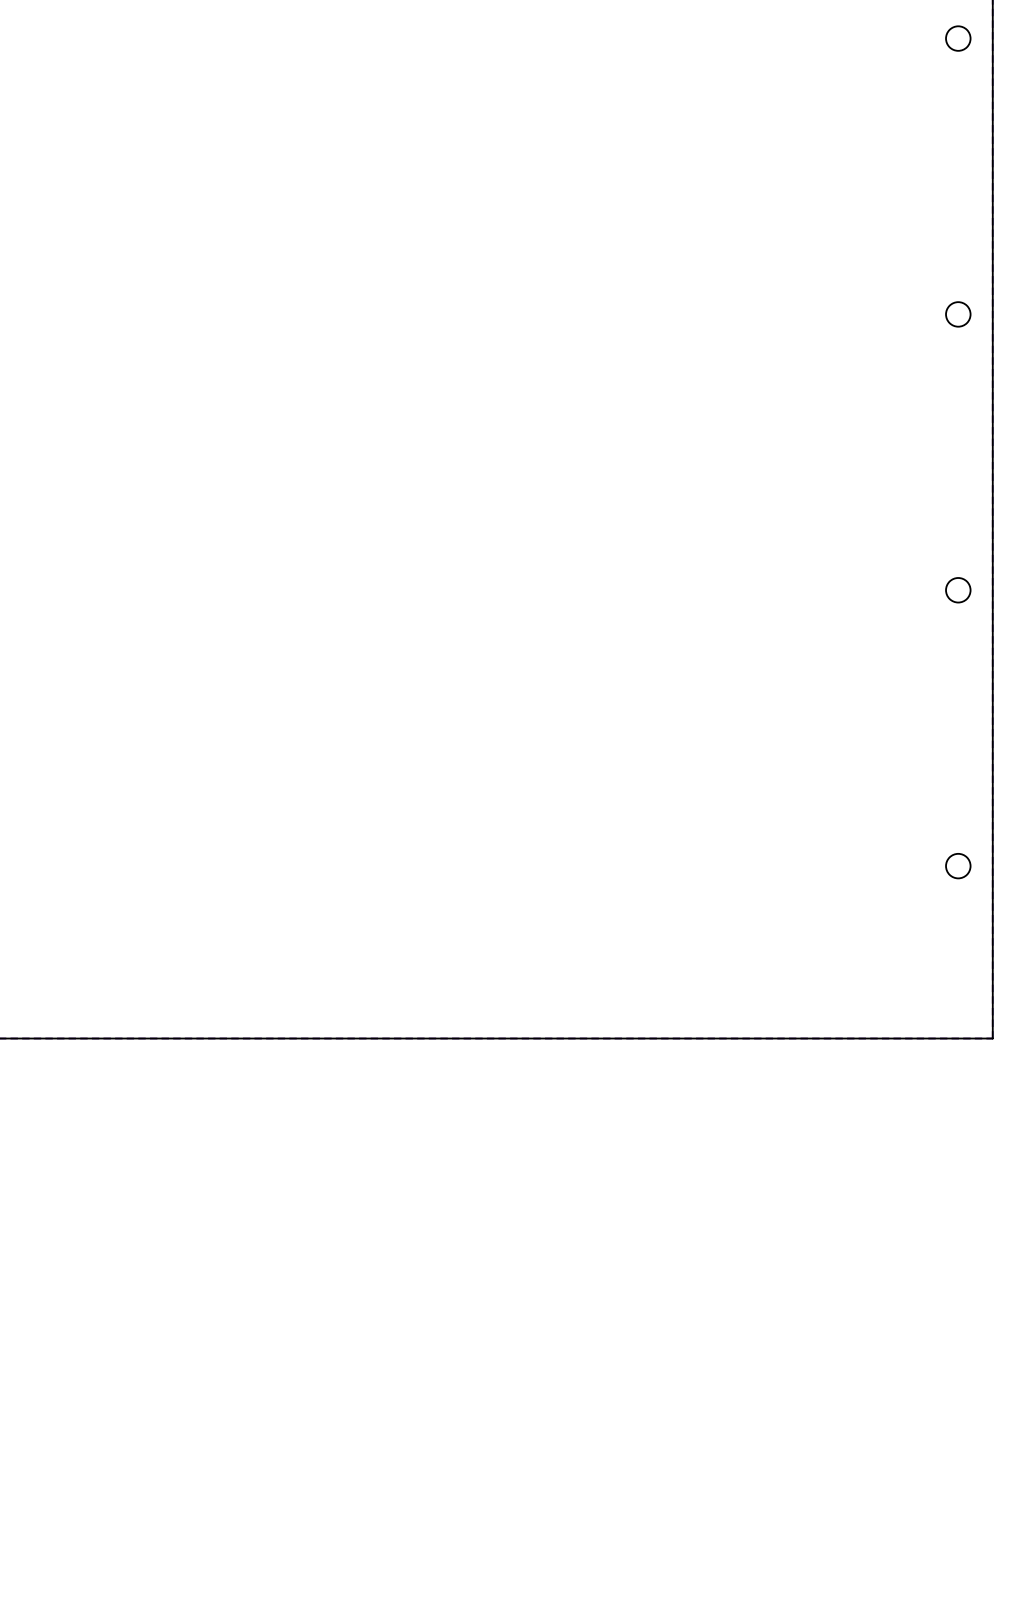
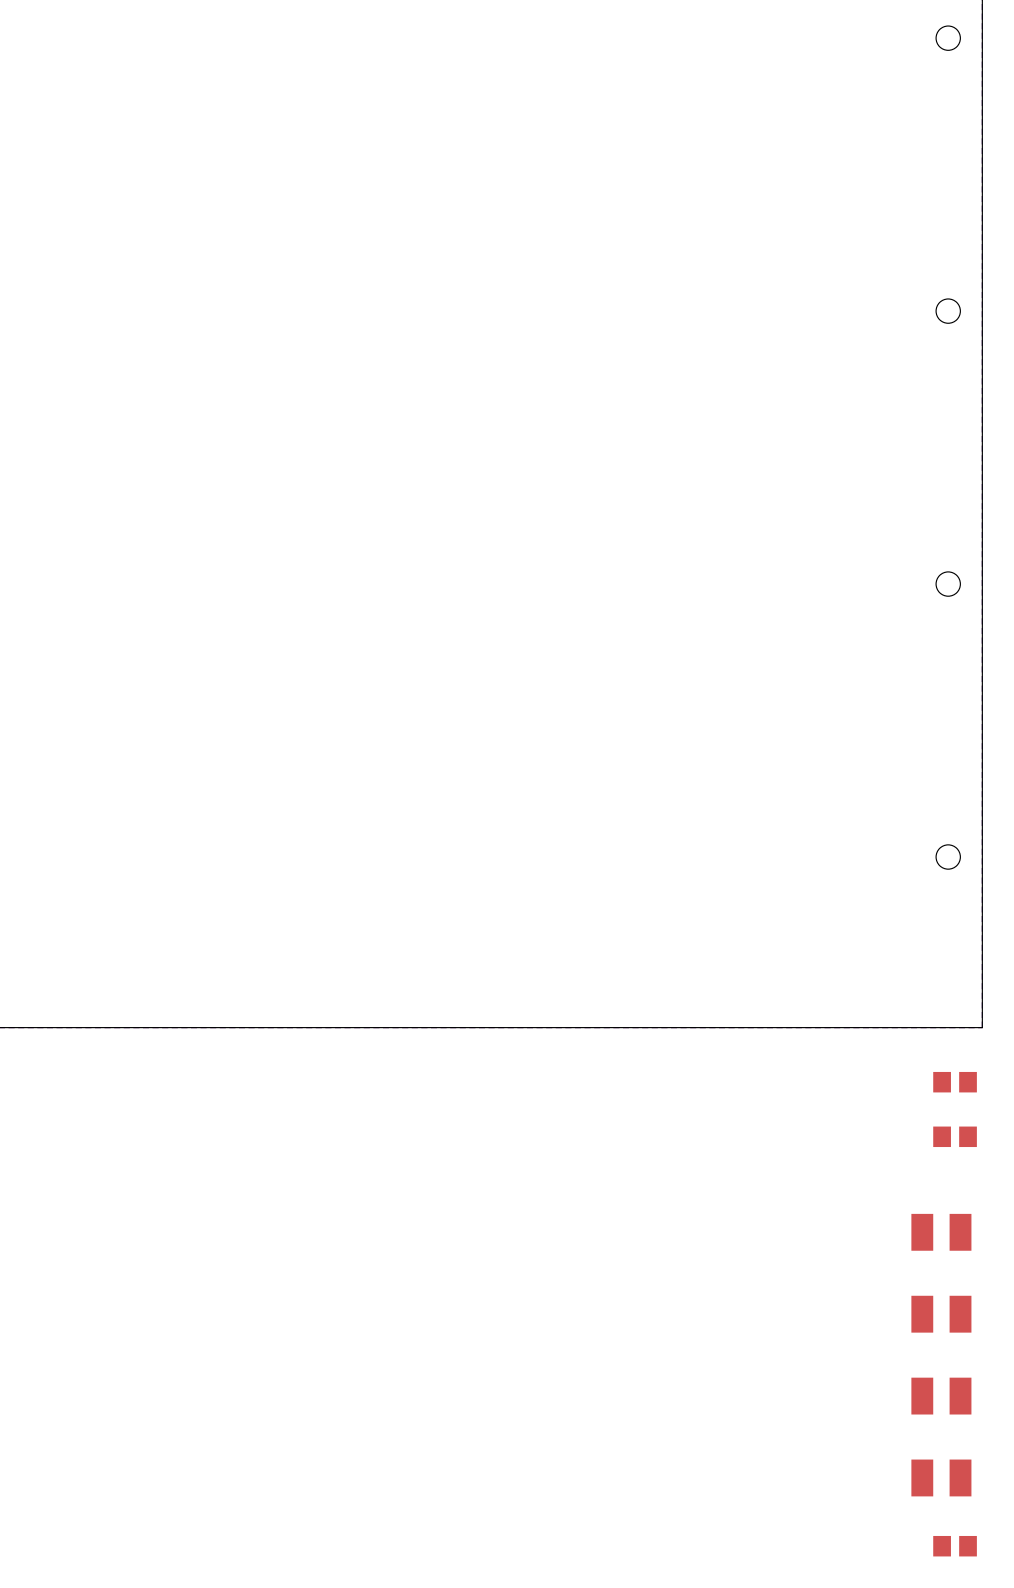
part: none -> (955, 1082)
part: none -> (955, 1136)
part: none -> (941, 1232)
part: none -> (941, 1314)
part: none -> (941, 1396)
part: none -> (941, 1477)
part: none -> (955, 1546)

